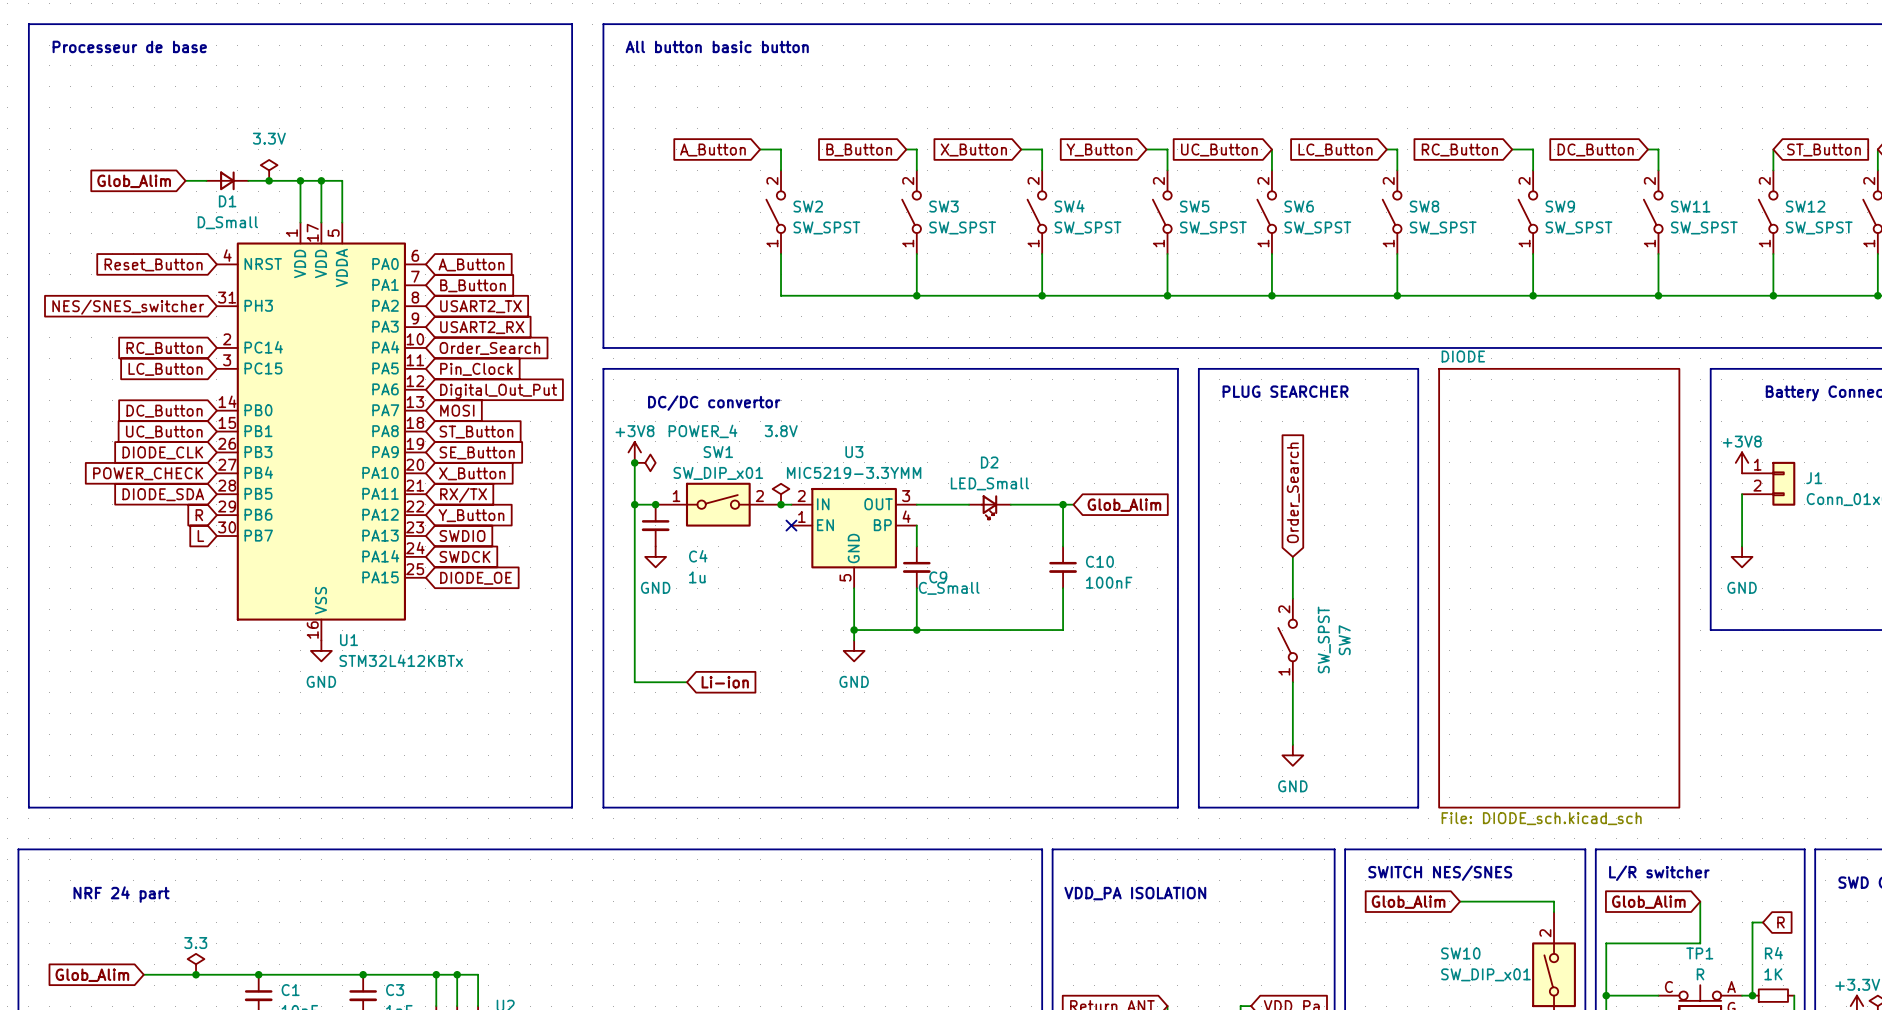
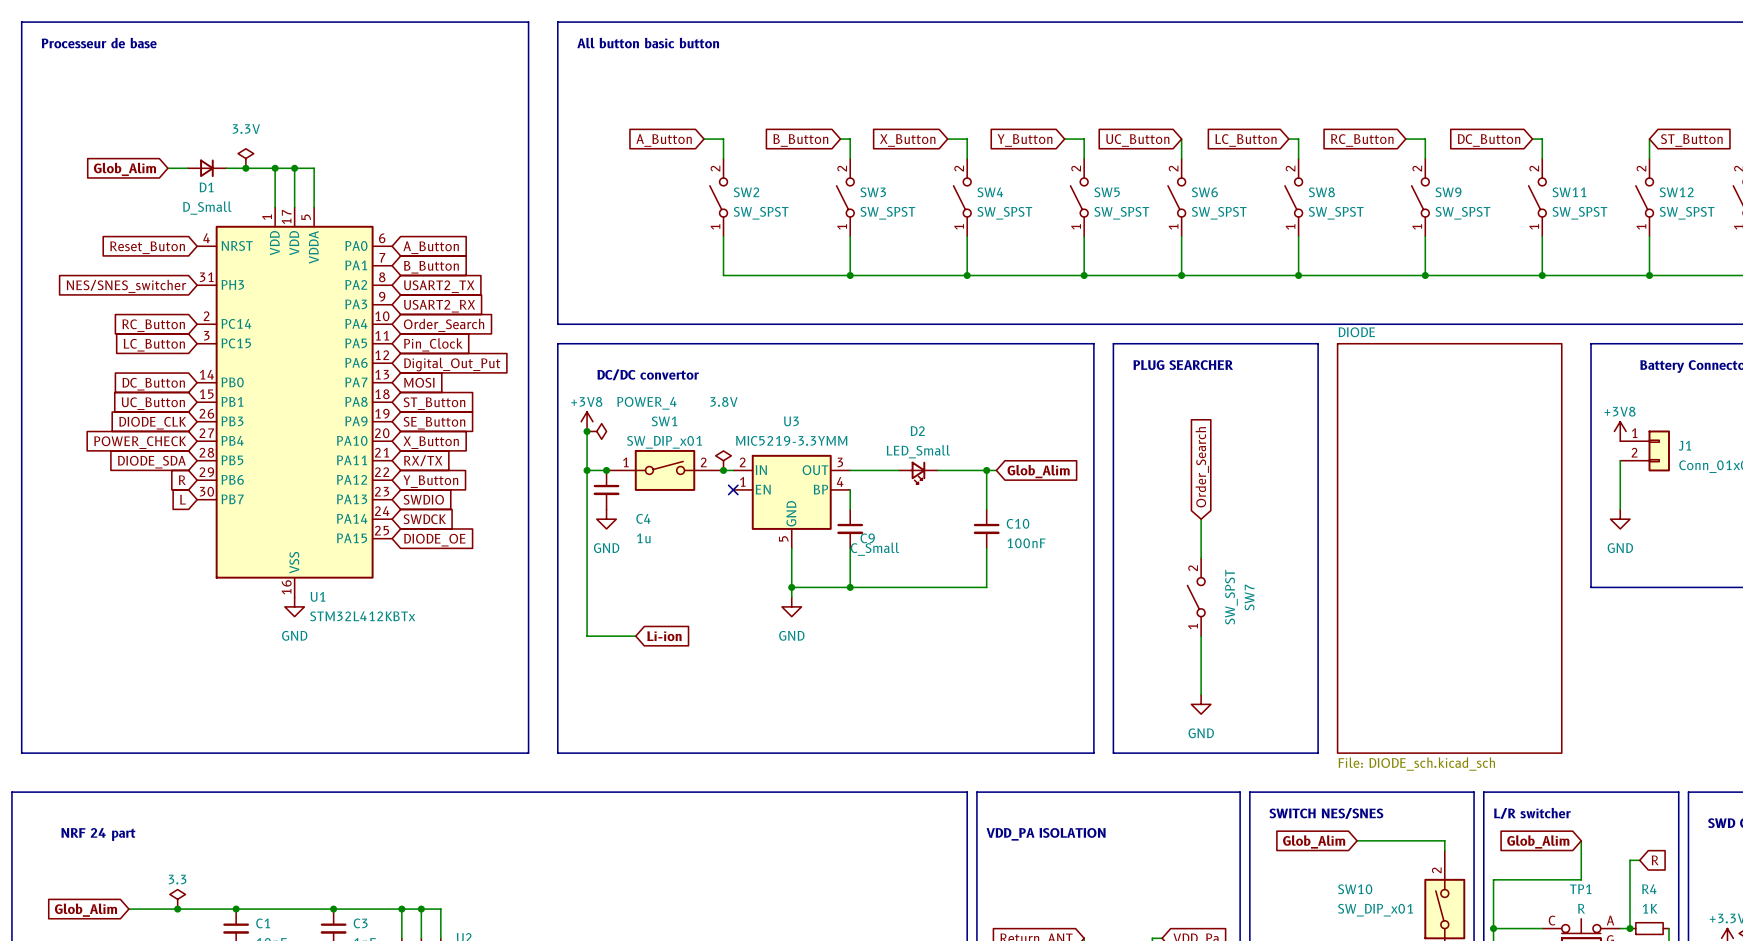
global label: Reset_Button (153, 264) -> Reset_Buton (147, 247)

